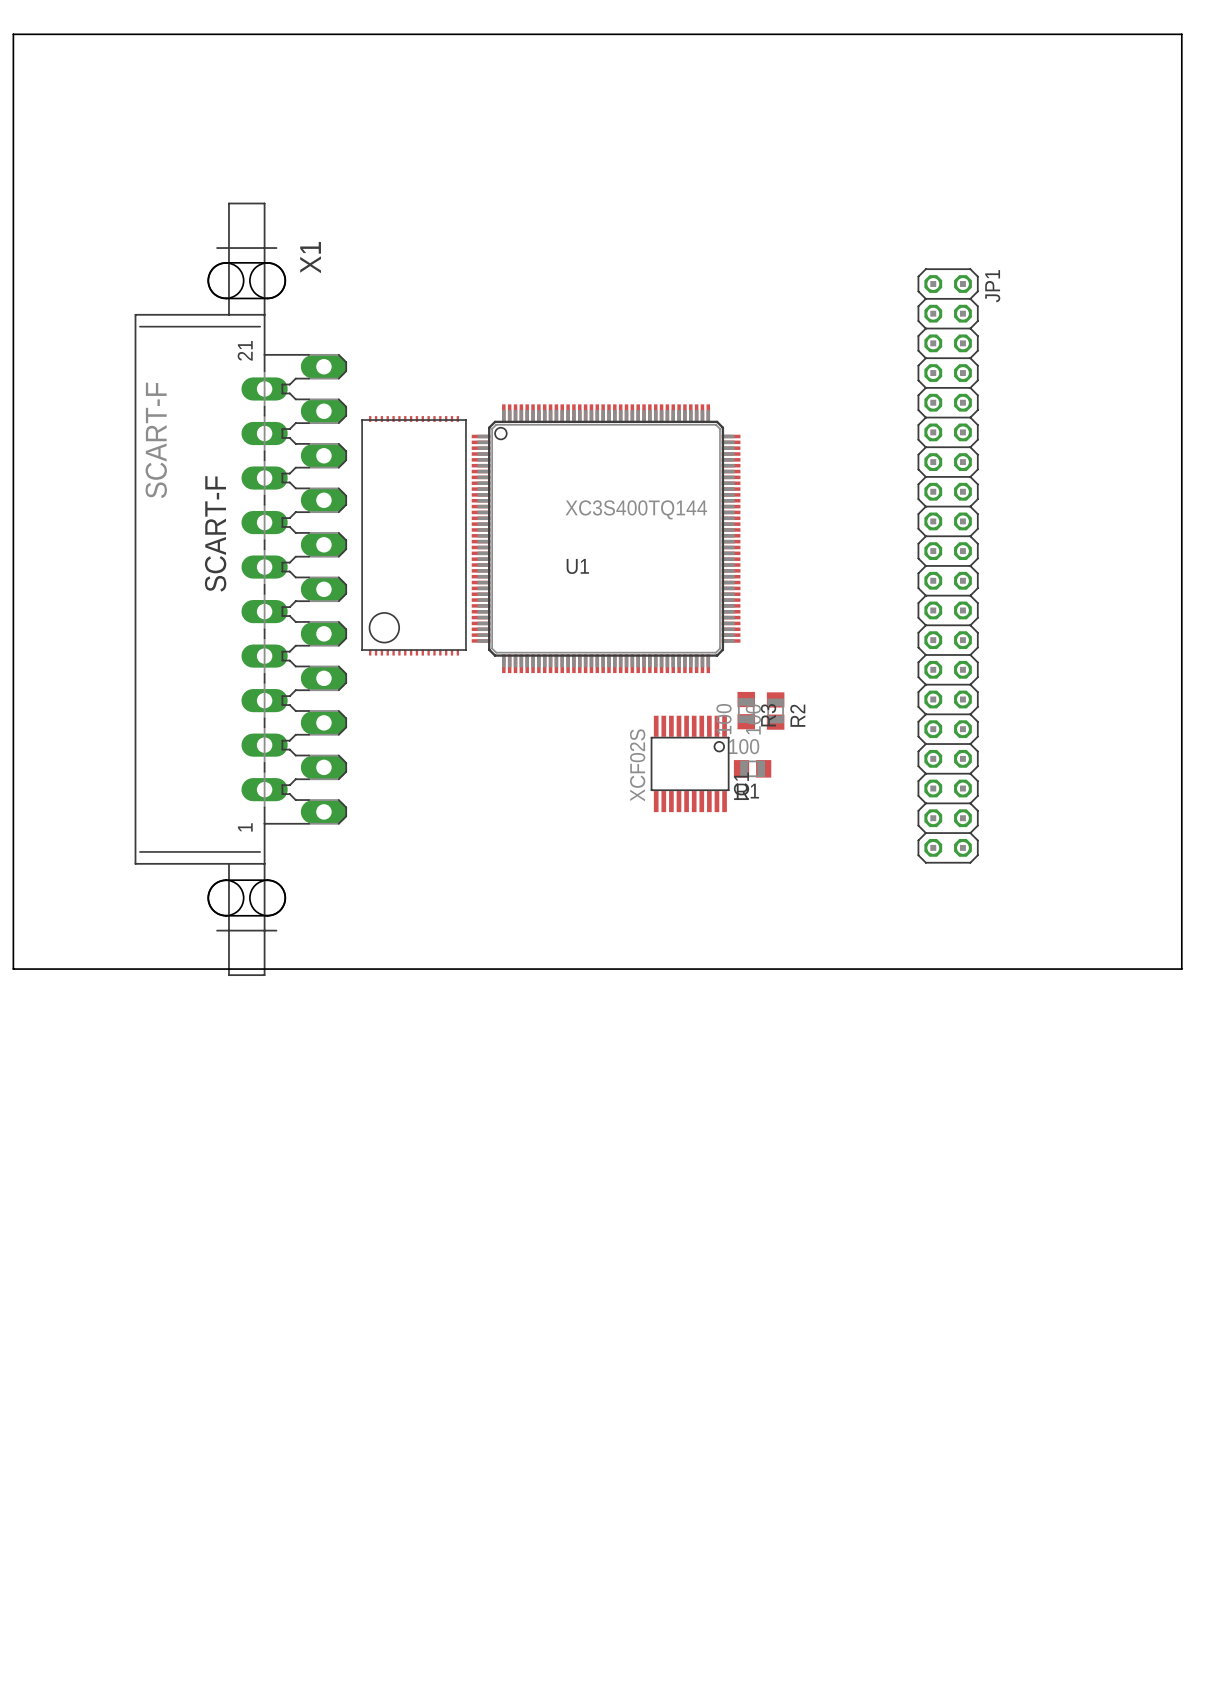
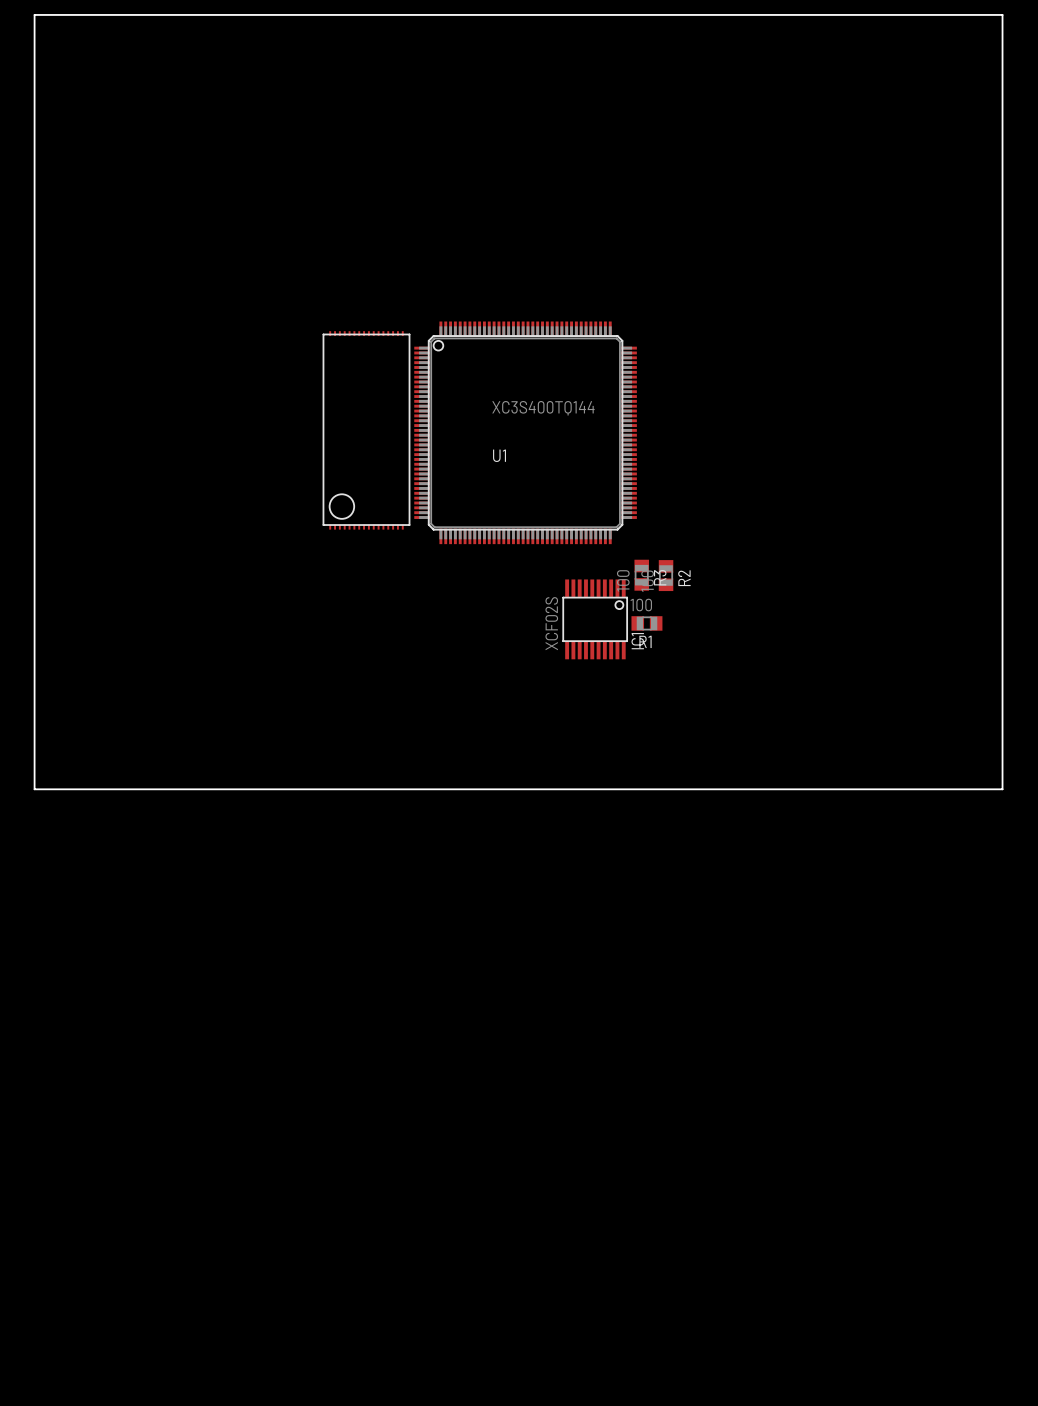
JP1: (948, 565) -> none
X1: SCART-F (240, 589) -> none

